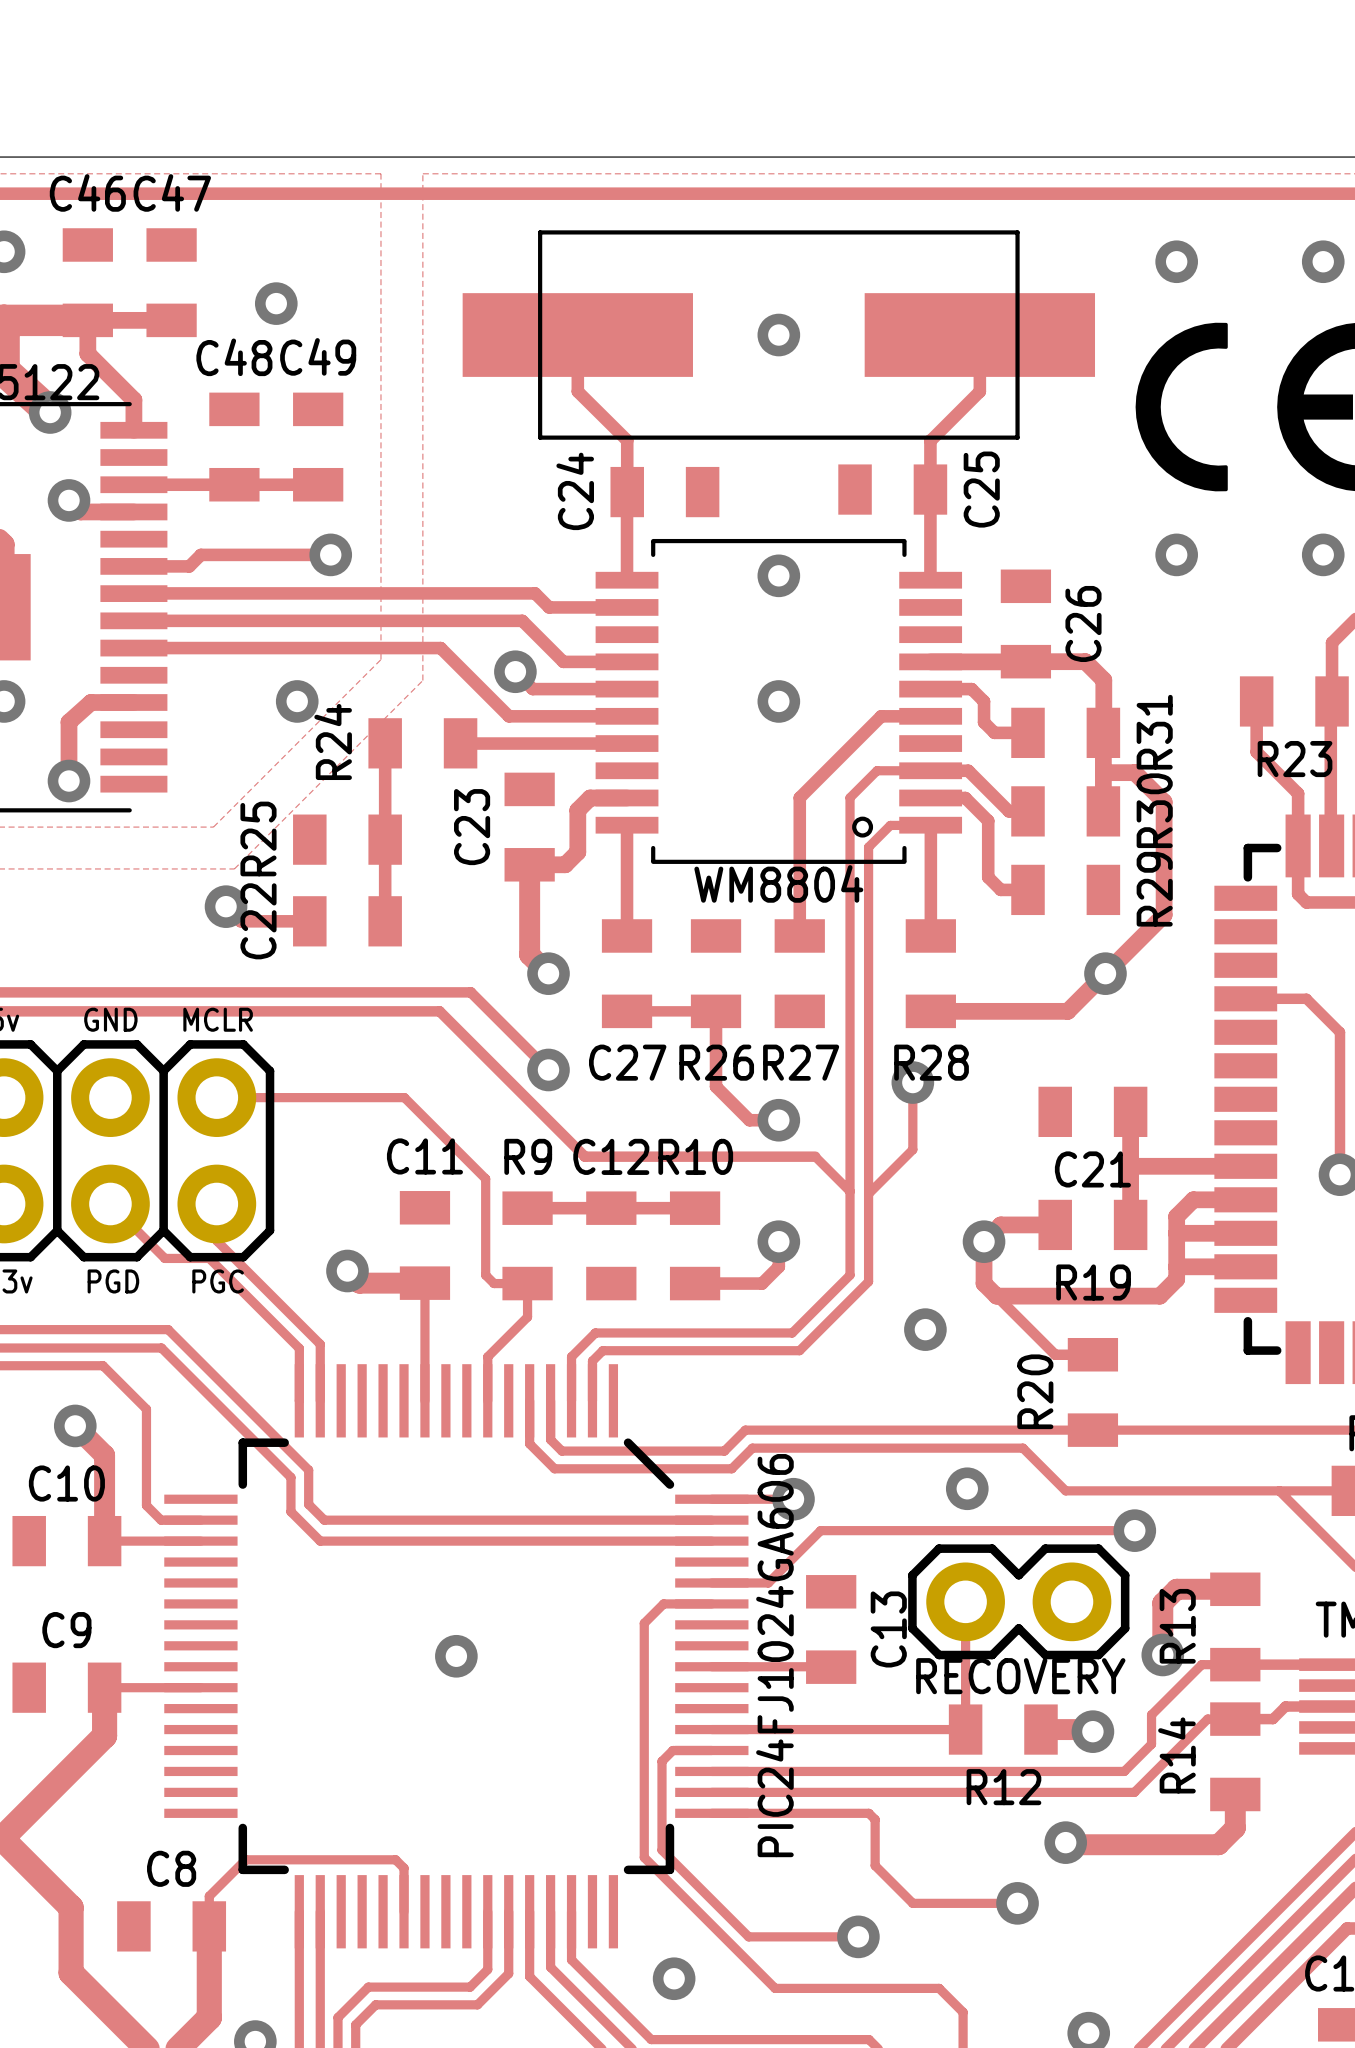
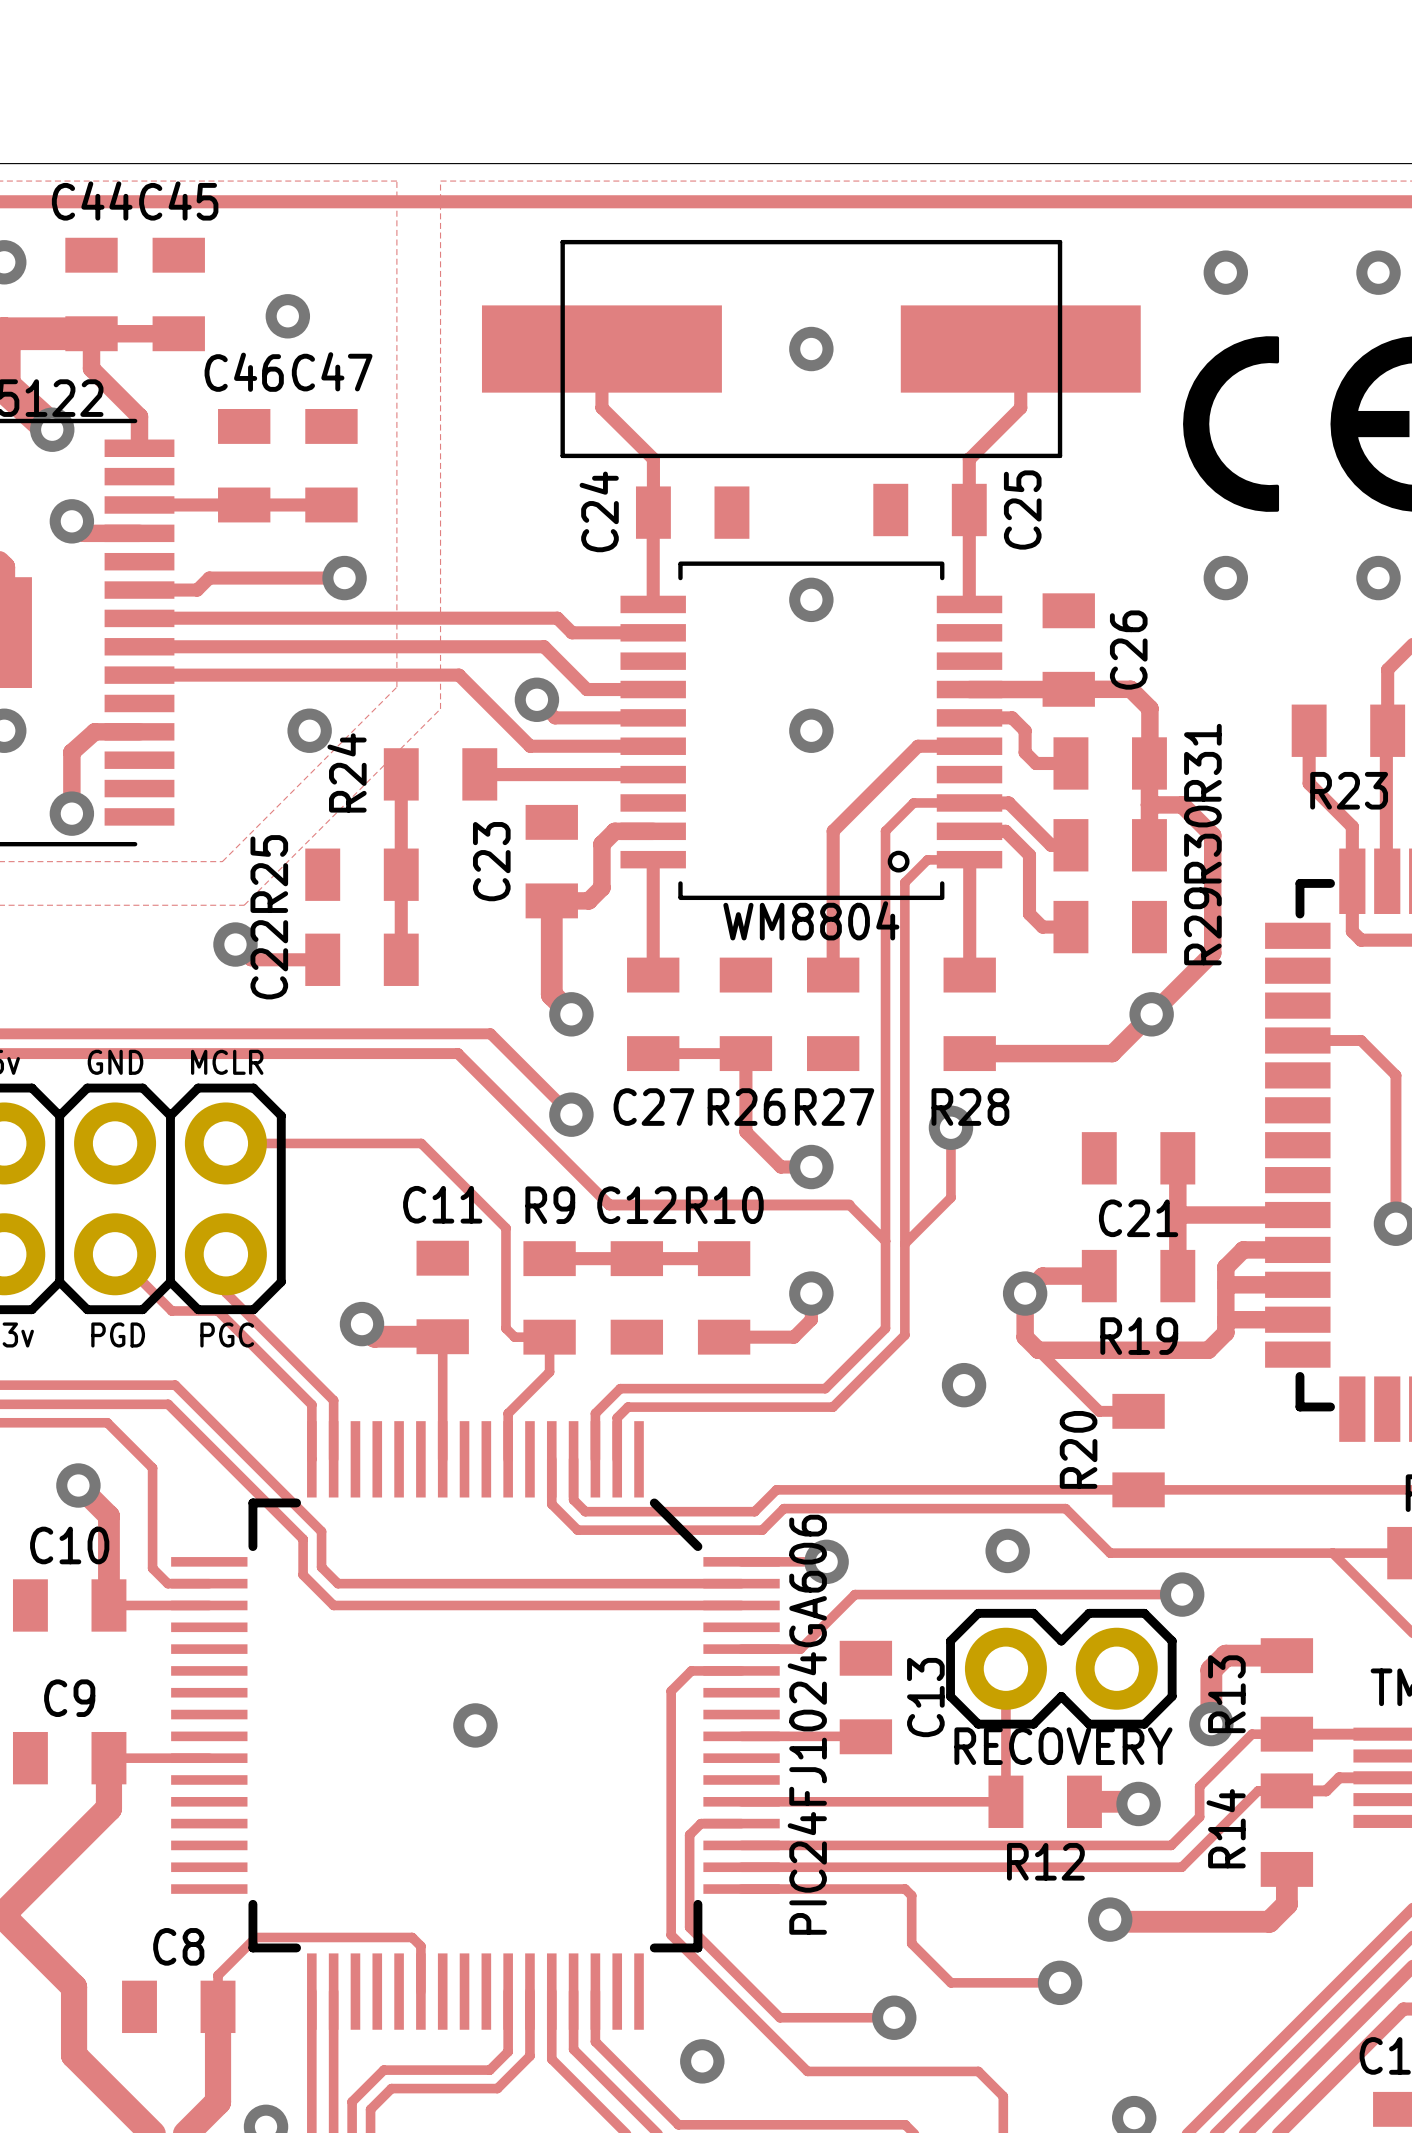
C46 name: C46 (87, 192) -> C44 (92, 200)
C47 name: C47 (172, 192) -> C45 (178, 200)
C49 name: C49 (318, 356) -> C47 (332, 371)
C48 name: C48 (234, 357) -> C46 (244, 372)

